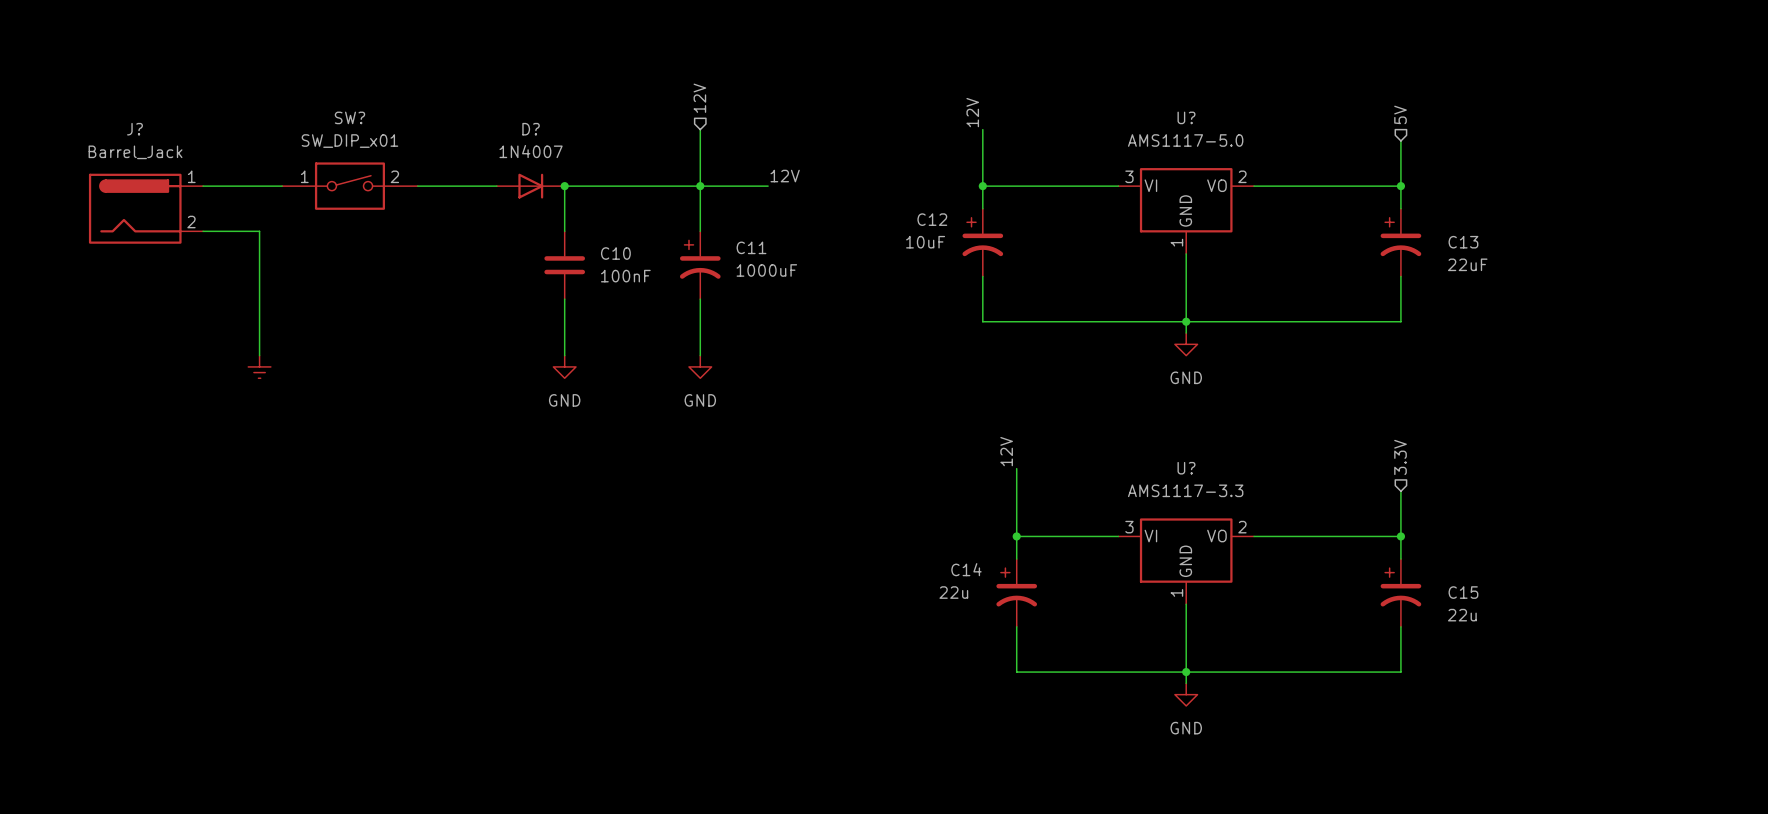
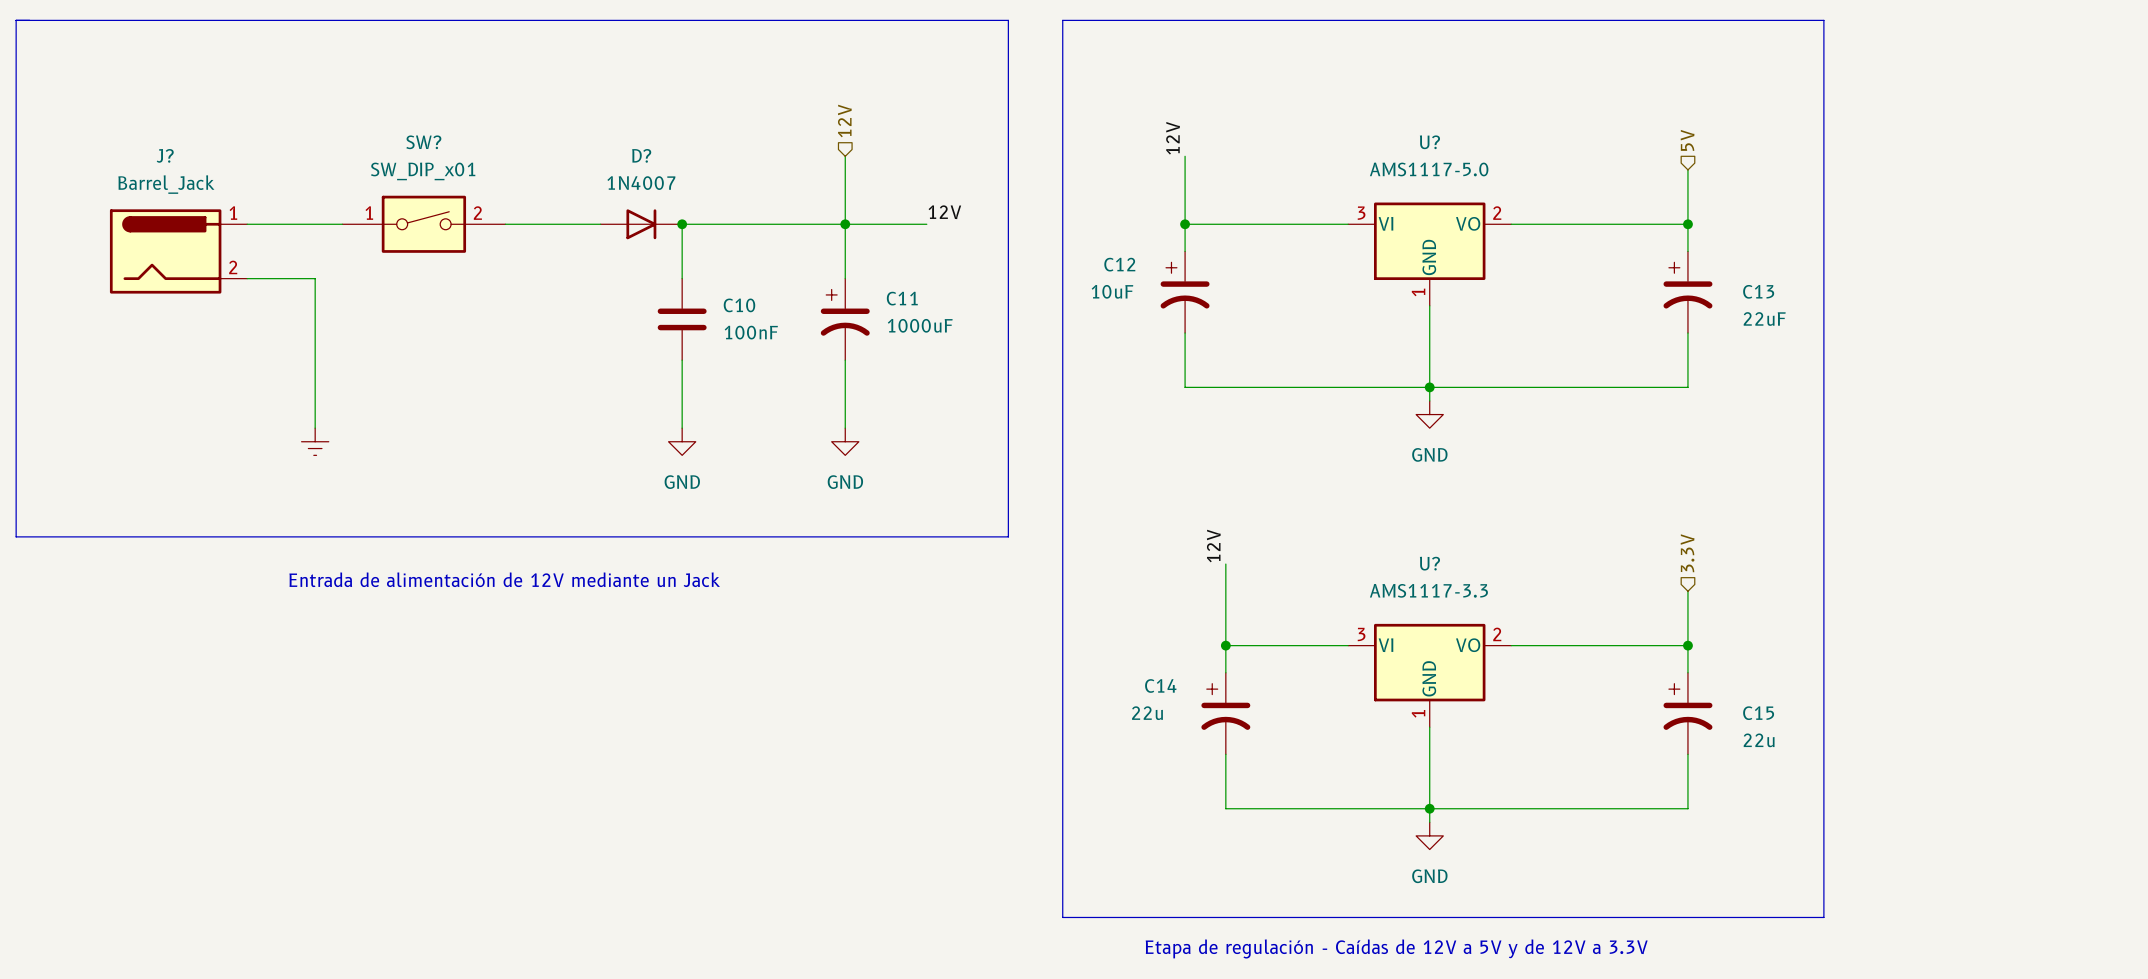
line: none -> (16, 20) (1008, 20) (1008, 536) (16, 536) (16, 20)
line: none -> (1062, 20) (1823, 20) (1823, 917) (1062, 917) (1062, 20)
text: none -> Entrada de alimentación de 12V mediante un Jack (504, 579)
text: none -> Etapa de regulación - Caídas de 12V a 5V y de 12V a 3.3V (1396, 948)

